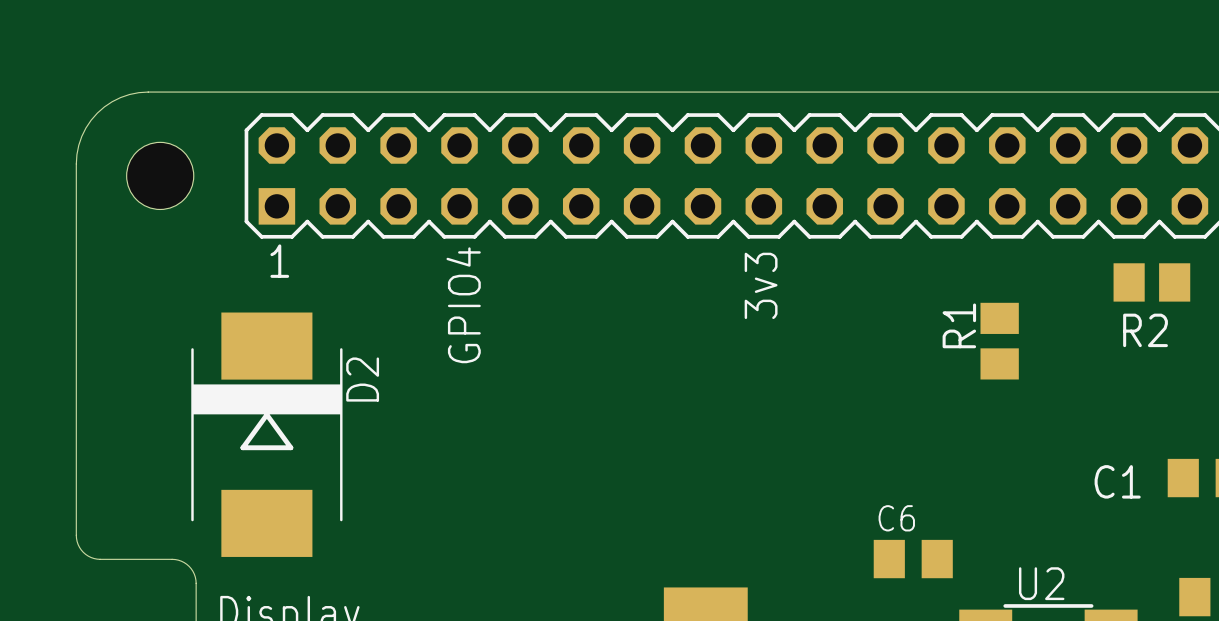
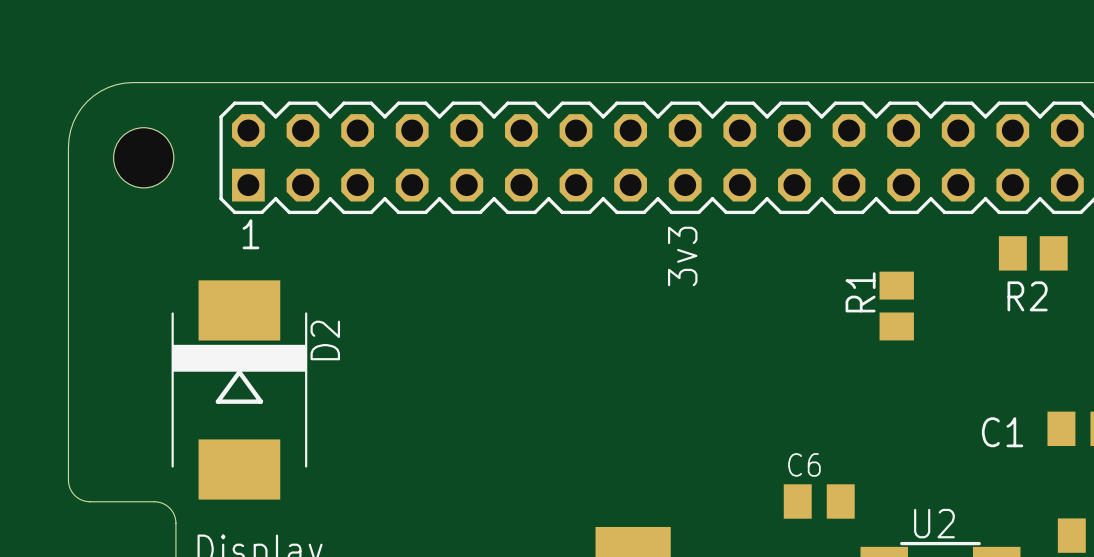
text: GPIO4 (463, 305) -> none

